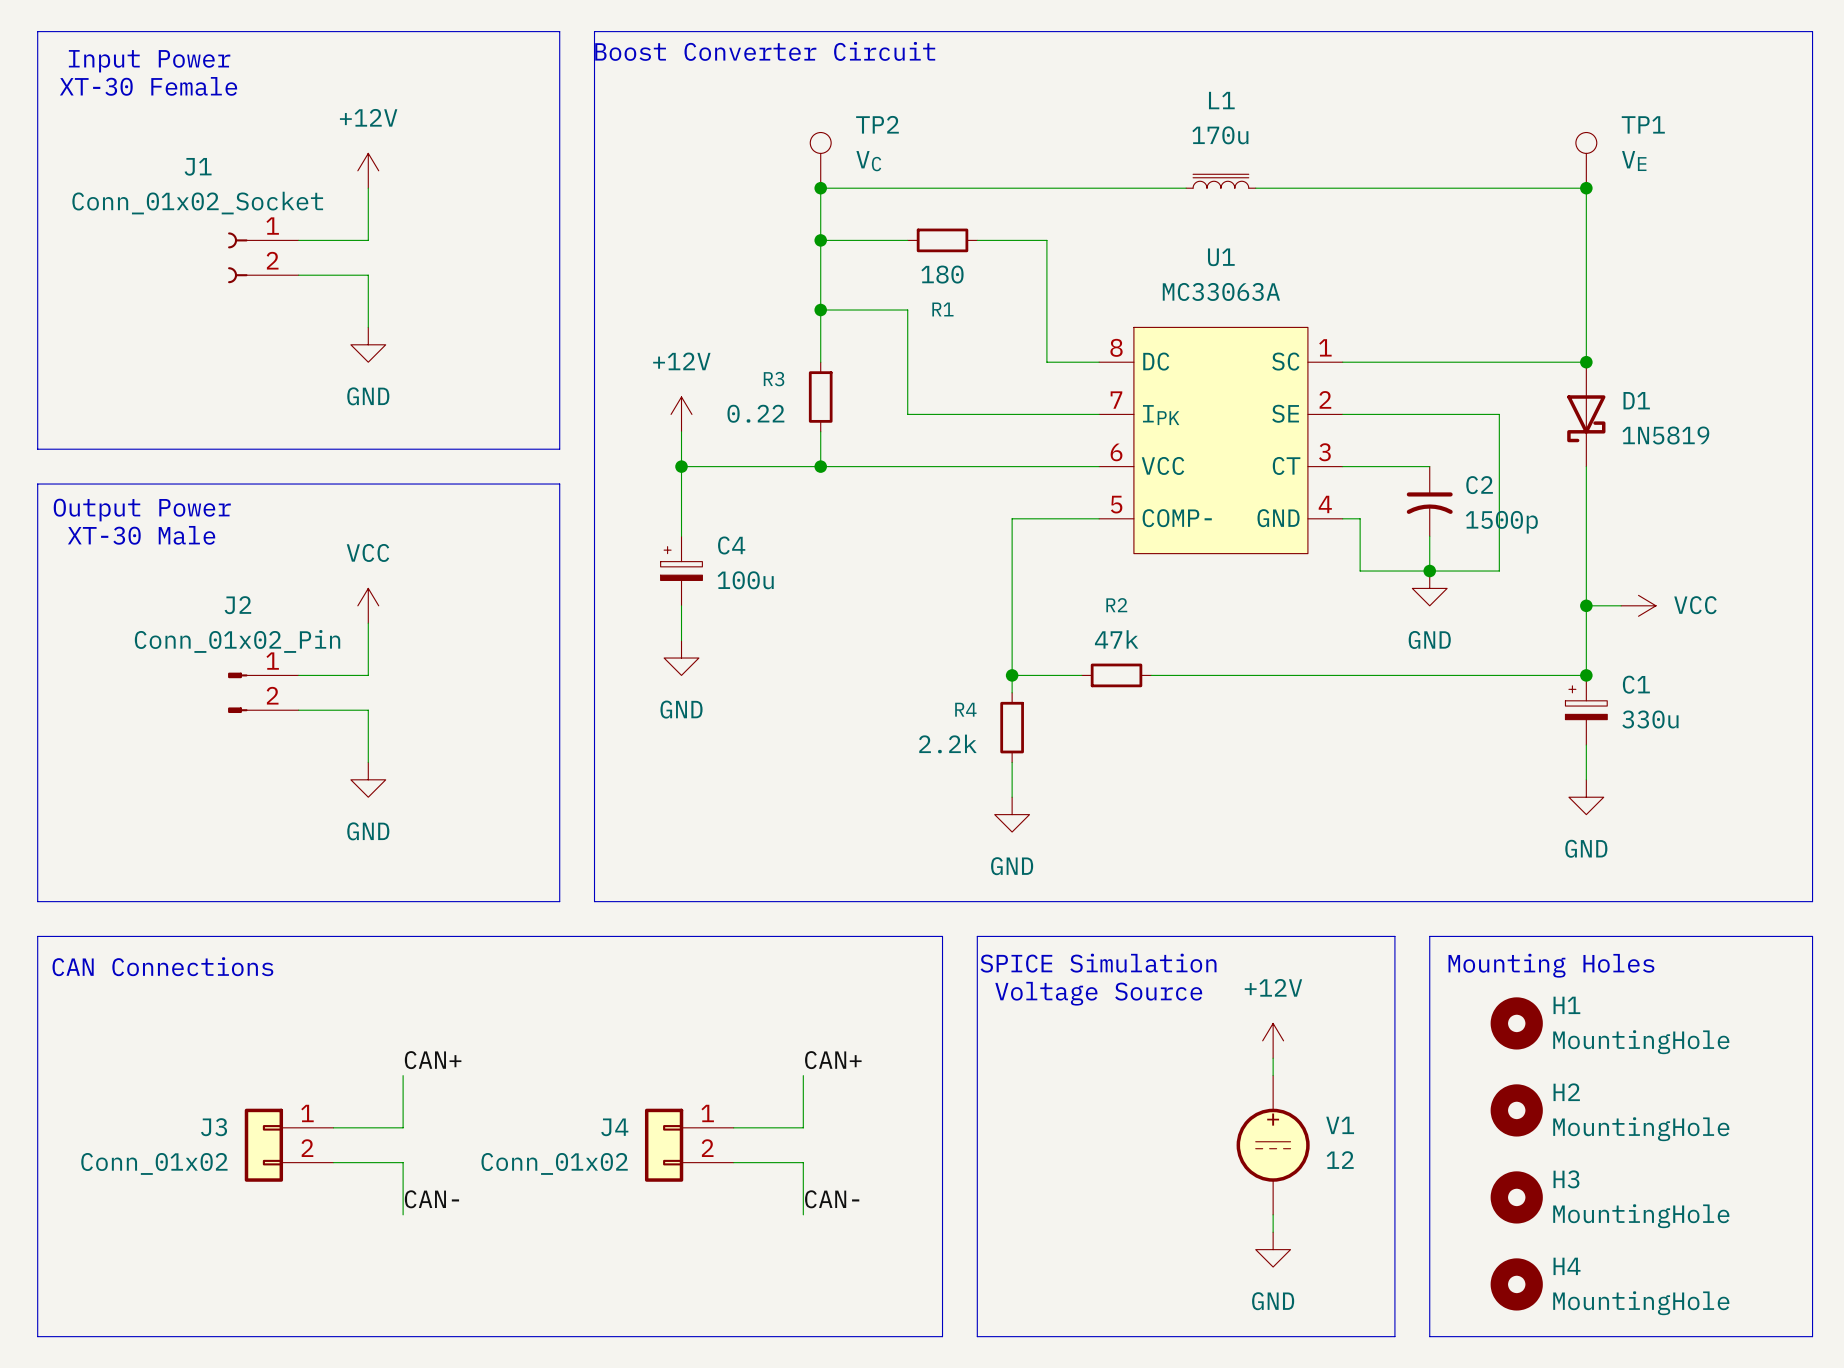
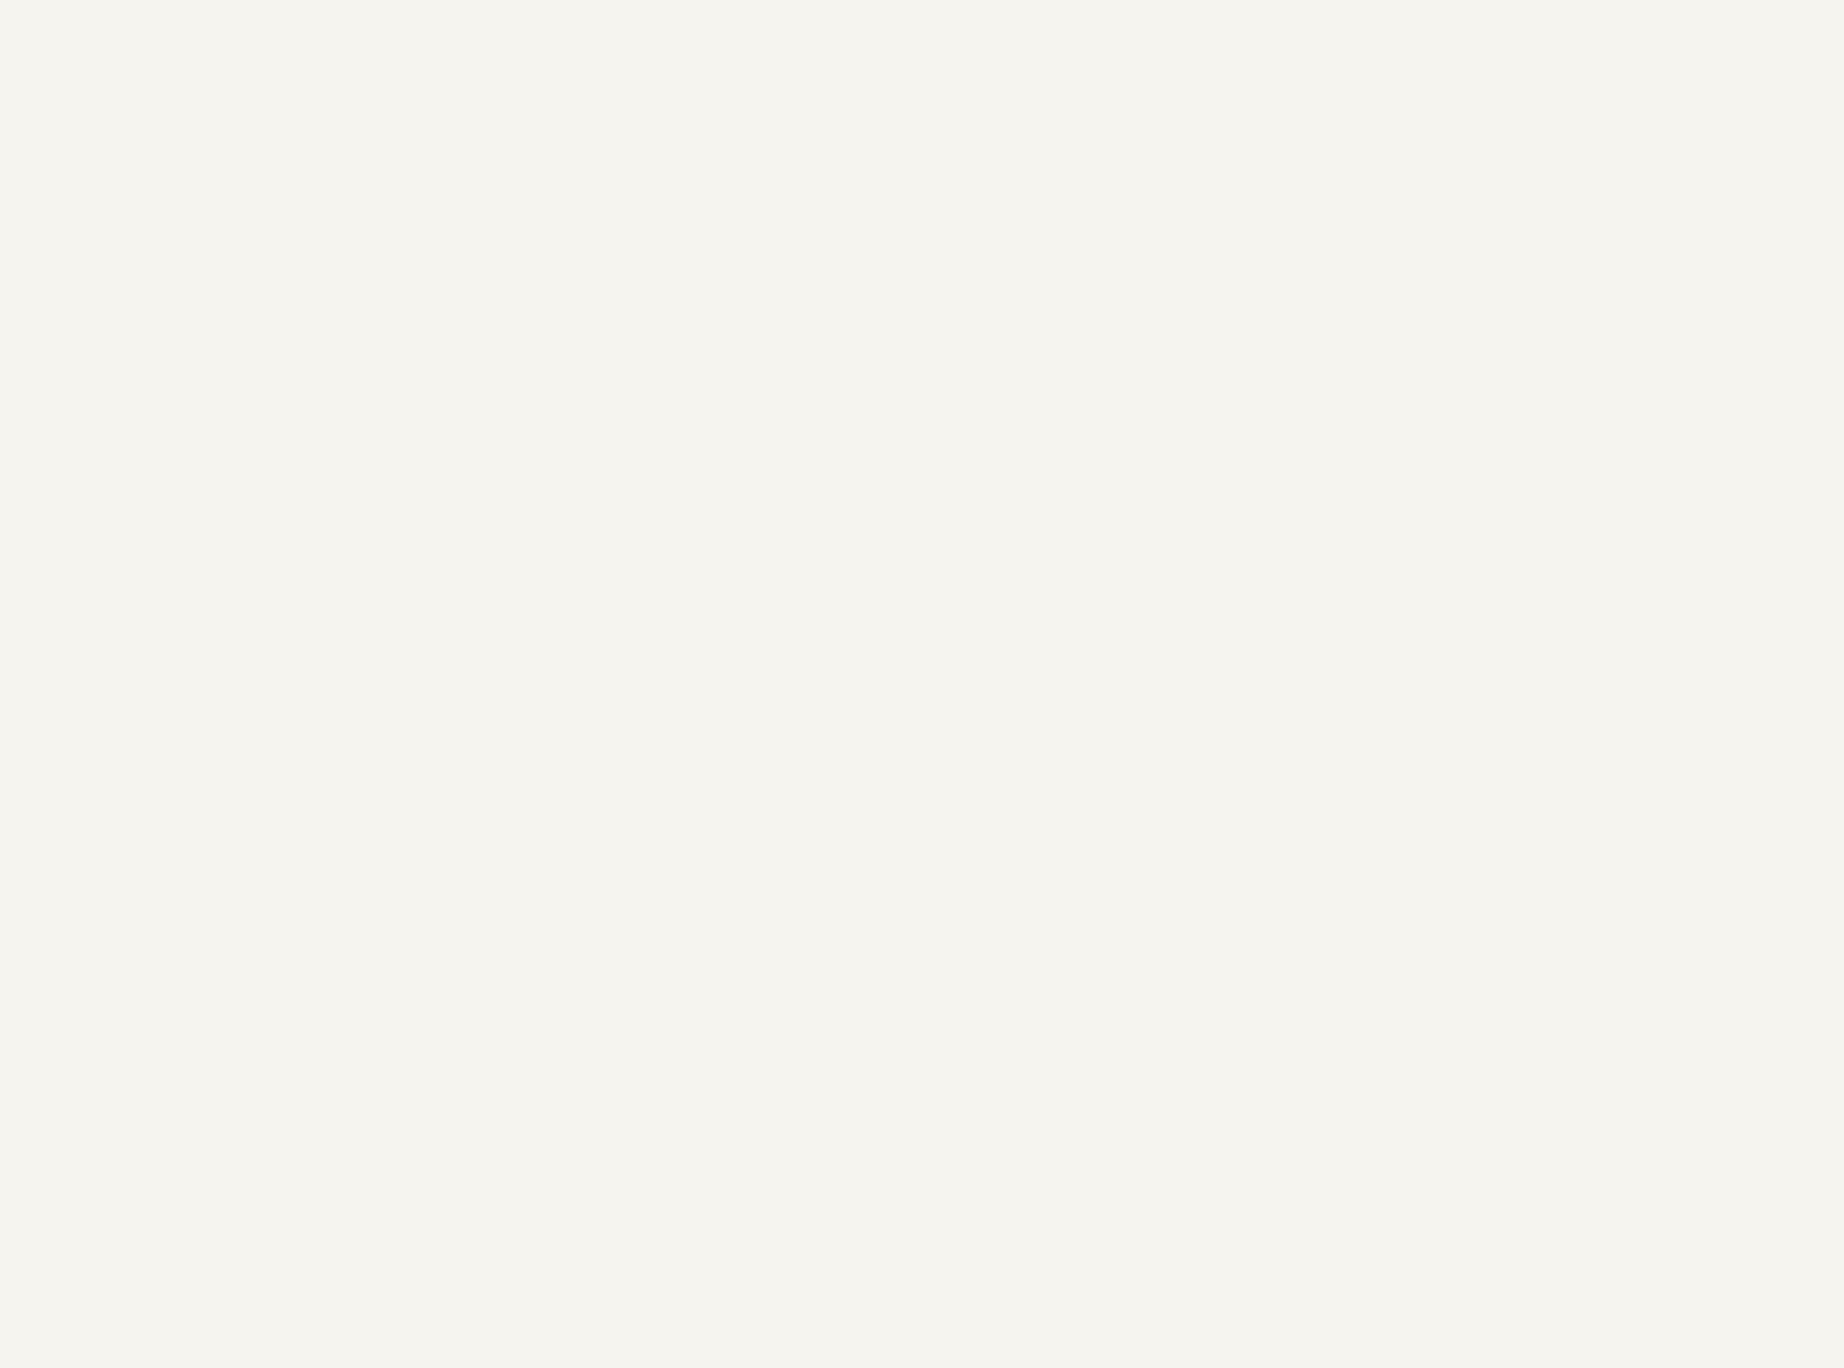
line: (37, 31) (37, 449) (559, 449) (559, 31) (37, 31) -> none
line: (594, 31) (1812, 31) (1812, 901) (594, 901) (594, 31) -> none
text: Boost Converter Circuit (765, 51) -> none
text: Input Power (149, 61) -> none
text: XT-30 Female (148, 86) -> none
TP2: VC (820, 160) -> none
TP1: VE (1586, 160) -> none
power symbol: +12V (368, 170) -> none
L1: 170u (1220, 181) -> none
wire: (368, 188) (368, 240) (298, 240) -> none
junction: (820, 188) -> none
wire: (1186, 188) (820, 188) (820, 362) -> none
wire: (1255, 188) (1586, 188) (1586, 362) (1342, 362) -> none
junction: (1586, 188) -> none
wire: (820, 240) (907, 240) -> none
junction: (820, 240) -> none
R1: 180 (942, 240) -> none
wire: (977, 240) (1046, 240) (1046, 362) (1099, 362) -> none
J1: Conn_01x02_Socket (263, 257) -> none
wire: (298, 275) (368, 275) (368, 327) -> none
wire: (820, 310) (907, 310) (907, 414) (1099, 414) -> none
junction: (820, 310) -> none
power symbol: GND (368, 344) -> none
junction: (1586, 362) -> none
R3: 0.22 (820, 397) -> none
power symbol: +12V (681, 414) -> none
wire: (1342, 414) (1499, 414) (1499, 571) (1360, 571) (1360, 518) (1342, 518) -> none
D1: 1N5819 (1586, 414) -> none
wire: (681, 431) (681, 536) -> none
wire: (820, 431) (820, 466) -> none
U1: MC33063A (1220, 440) -> none
wire: (681, 466) (1099, 466) -> none
junction: (681, 466) -> none
junction: (820, 466) -> none
wire: (1342, 466) (1429, 466) -> none
wire: (1586, 466) (1586, 675) (1151, 675) -> none
line: (37, 484) (559, 484) (559, 901) (37, 901) (37, 484) -> none
C2: 1500p (1429, 501) -> none
text: Output Power (142, 510) -> none
wire: (1099, 518) (1012, 518) (1012, 692) -> none
text: XT-30 Male (141, 535) -> none
wire: (1429, 536) (1429, 571) -> none
C4: 100u (681, 571) -> none
junction: (1429, 571) -> none
power symbol: GND (1429, 588) -> none
power symbol: VCC (368, 605) -> none
wire: (681, 605) (681, 640) -> none
wire: (1586, 605) (1621, 605) -> none
junction: (1586, 605) -> none
power symbol: VCC (1638, 605) -> none
wire: (368, 623) (368, 675) (298, 675) -> none
power symbol: GND (681, 658) -> none
wire: (1012, 675) (1081, 675) -> none
junction: (1012, 675) -> none
R2: 47k (1116, 675) -> none
junction: (1586, 675) -> none
J2: Conn_01x02_Pin (263, 692) -> none
wire: (298, 710) (368, 710) (368, 762) -> none
C1: 330u (1586, 710) -> none
R4: 2.2k (1012, 727) -> none
wire: (1586, 745) (1586, 779) -> none
wire: (1012, 762) (1012, 797) -> none
power symbol: GND (368, 779) -> none
power symbol: GND (1586, 797) -> none
power symbol: GND (1012, 814) -> none
line: (37, 936) (942, 936) (942, 1336) (37, 1336) (37, 936) -> none
line: (977, 936) (1394, 936) (1394, 1336) (977, 1336) (977, 936) -> none
line: (1429, 936) (1812, 936) (1812, 1336) (1429, 1336) (1429, 936) -> none
text: SPICE Simulation (1098, 963) -> none
text: Mounting Holes (1551, 965) -> none
text: CAN Connections (162, 966) -> none
text: Voltage Source (1098, 993) -> none
H1: MountingHole (1516, 1023) -> none
power symbol: +12V (1273, 1040) -> none
wire: (1273, 1058) (1273, 1075) -> none
label: CAN+ (433, 1060) -> none
label: CAN+ (833, 1060) -> none
wire: (403, 1075) (403, 1127) (333, 1127) -> none
wire: (803, 1075) (803, 1127) (733, 1127) -> none
H2: MountingHole (1516, 1110) -> none
J3: Conn_01x02 (289, 1145) -> none
J4: Conn_01x02 (689, 1145) -> none
V1: 12 (1273, 1145) -> none
wire: (333, 1162) (403, 1162) (403, 1214) -> none
wire: (733, 1162) (803, 1162) (803, 1214) -> none
H3: MountingHole (1516, 1197) -> none
label: CAN- (431, 1199) -> none
label: CAN- (832, 1199) -> none
wire: (1273, 1214) (1273, 1232) -> none
power symbol: GND (1273, 1249) -> none
H4: MountingHole (1516, 1284) -> none

